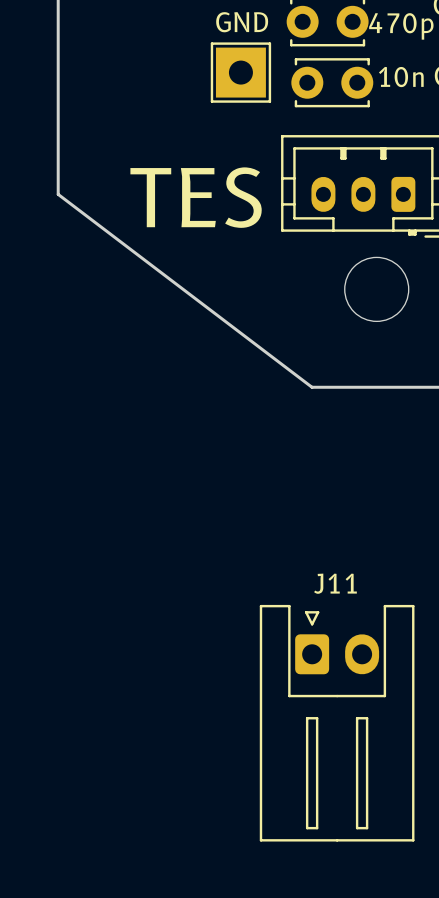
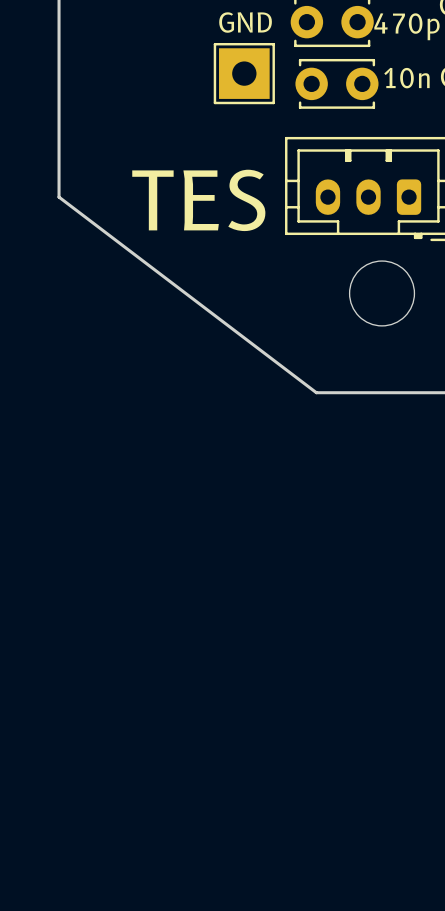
J11: (337, 723) -> none

